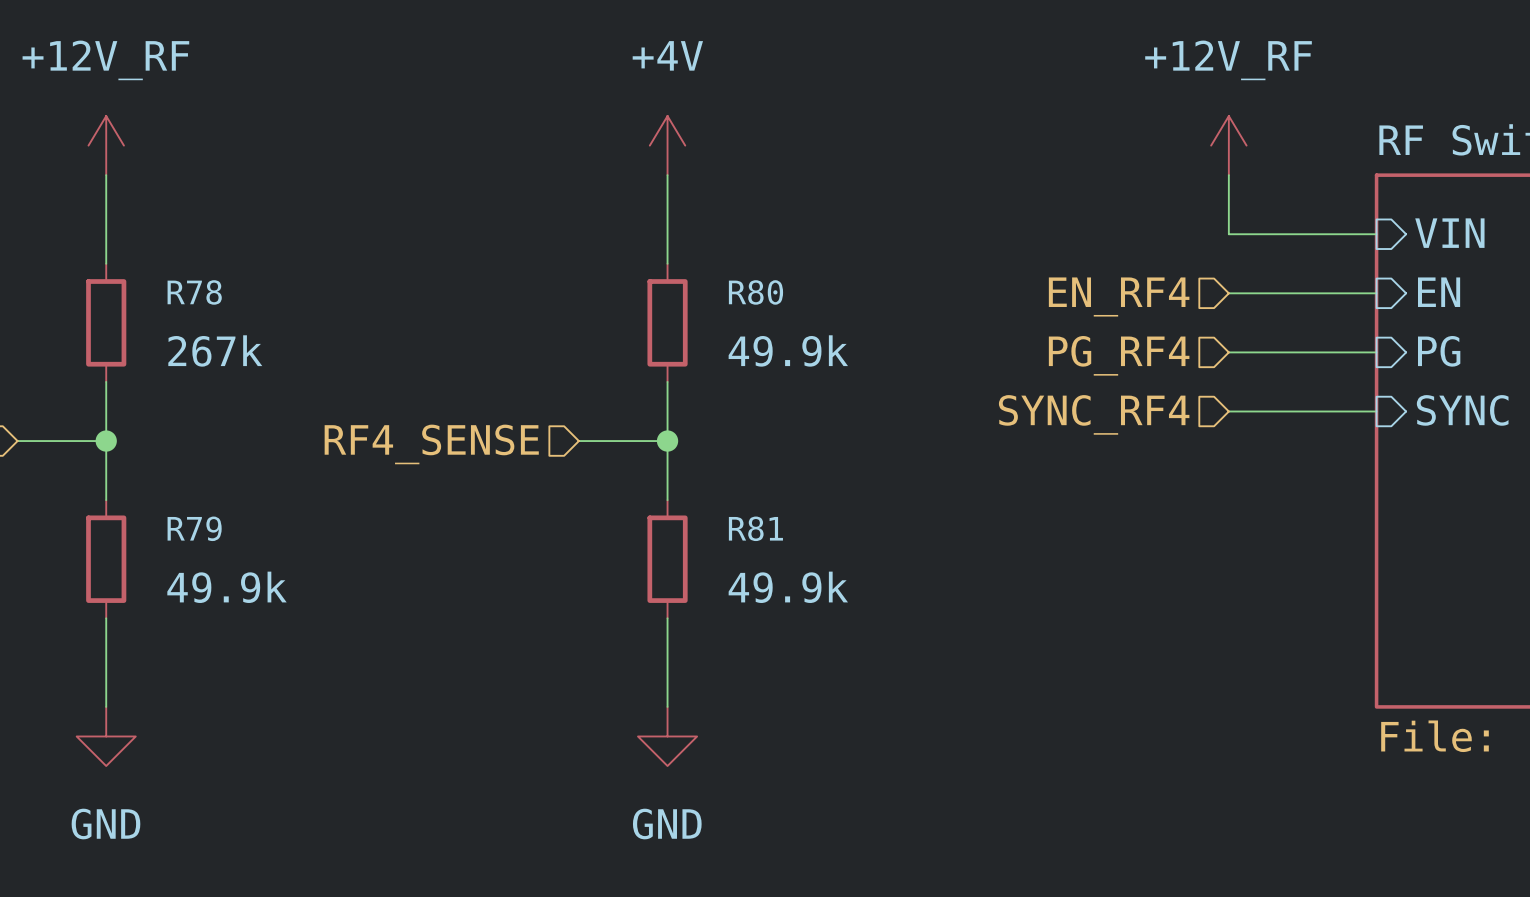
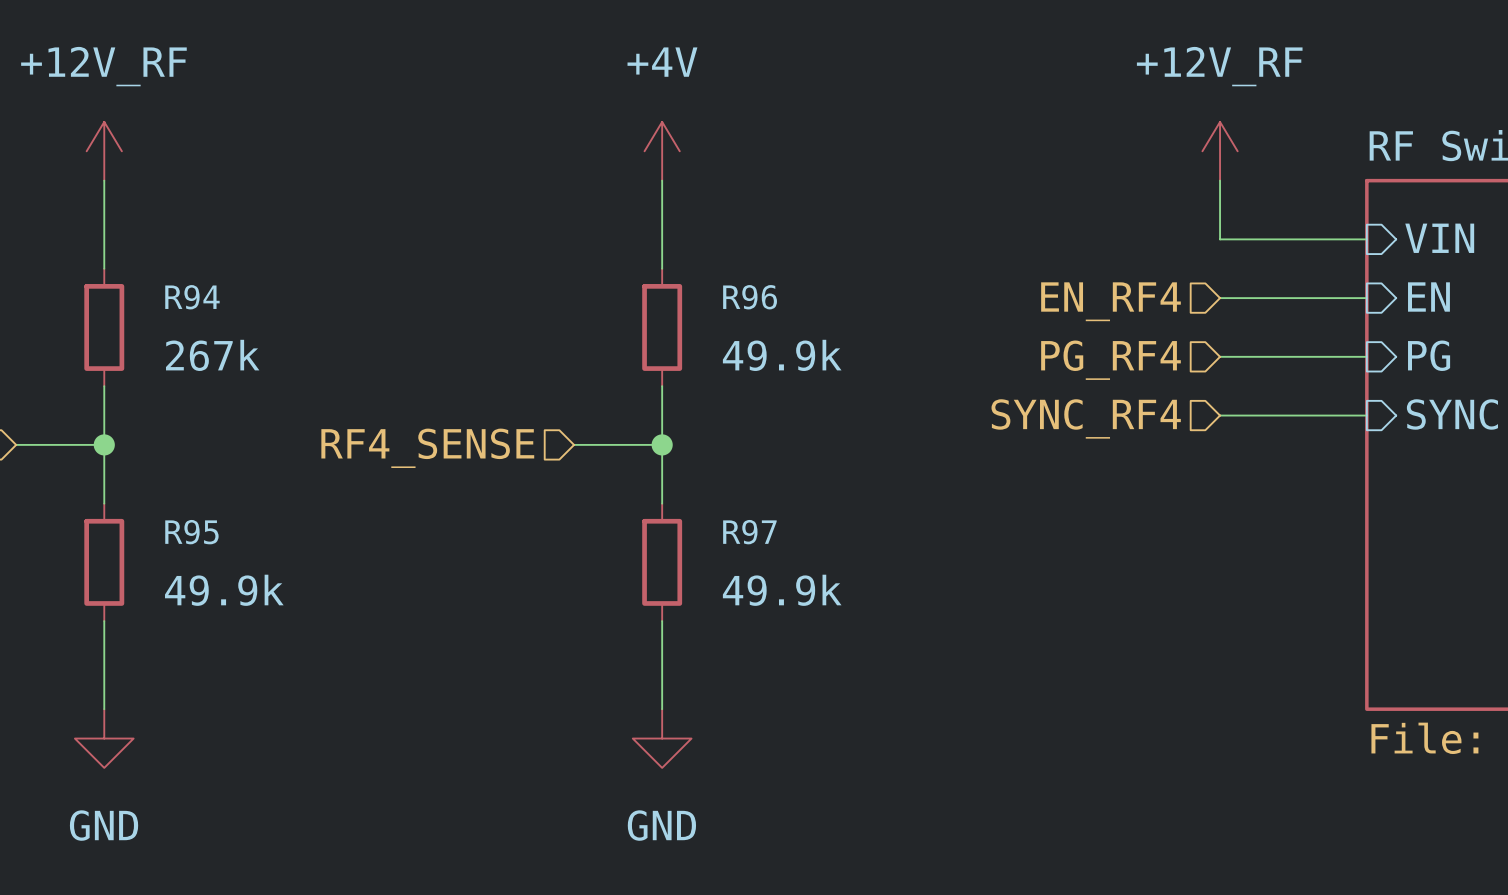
R78 name: R78 (194, 292) -> R94 (192, 297)
R80 name: R80 (755, 292) -> R96 (750, 297)
R79 name: R79 (194, 528) -> R95 (191, 532)
R81 name: R81 (755, 528) -> R97 (749, 532)

